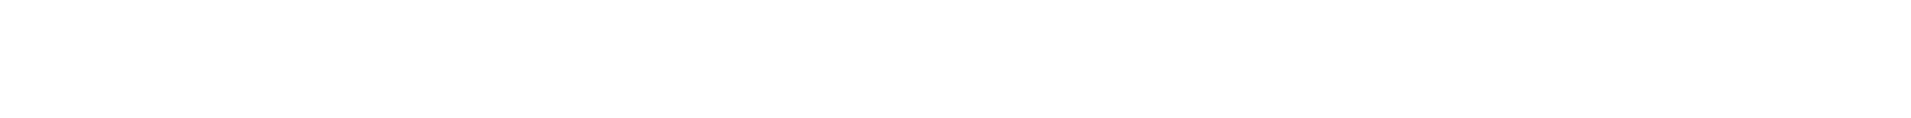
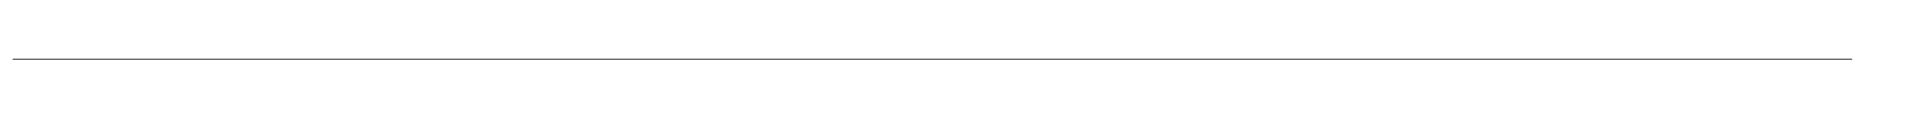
line: none -> (13, 59) (1851, 59)

